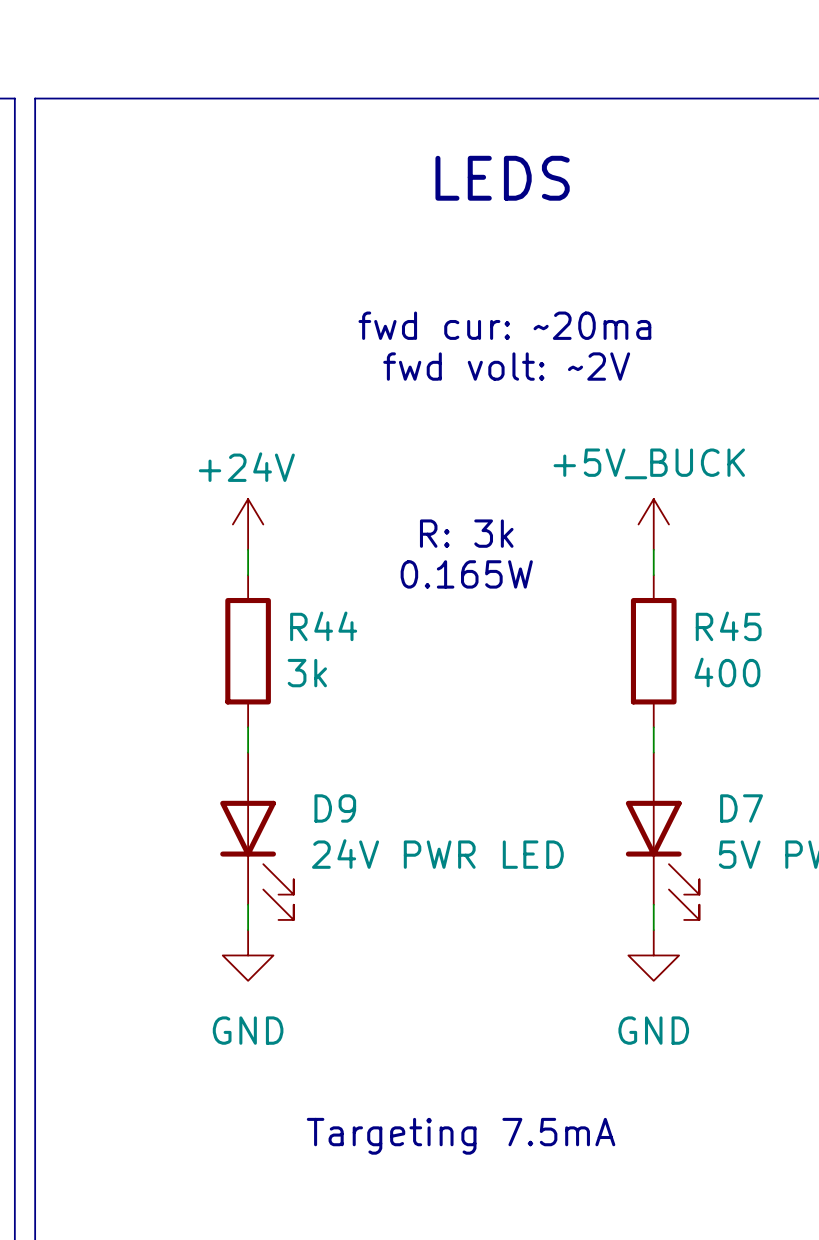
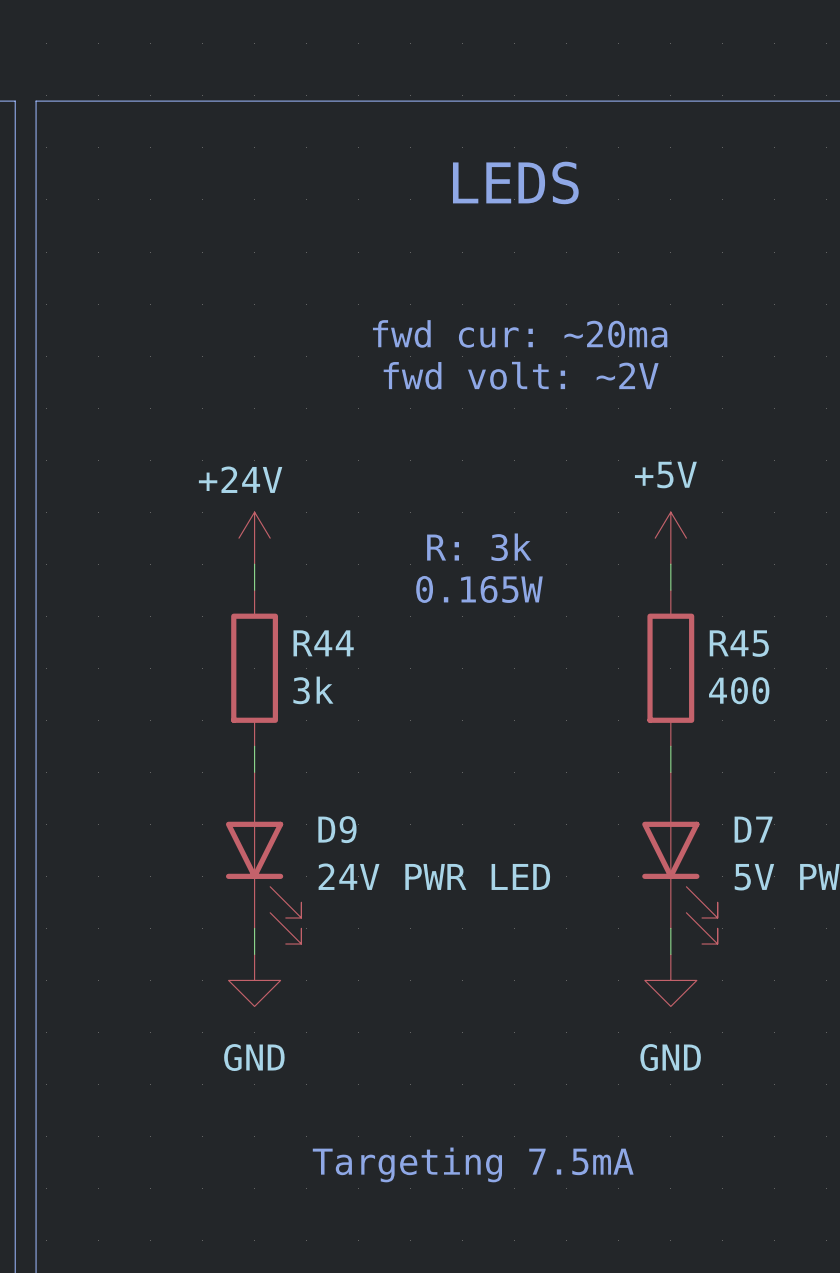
power symbol: +5V_BUCK (653, 524) -> +5V (670, 538)

